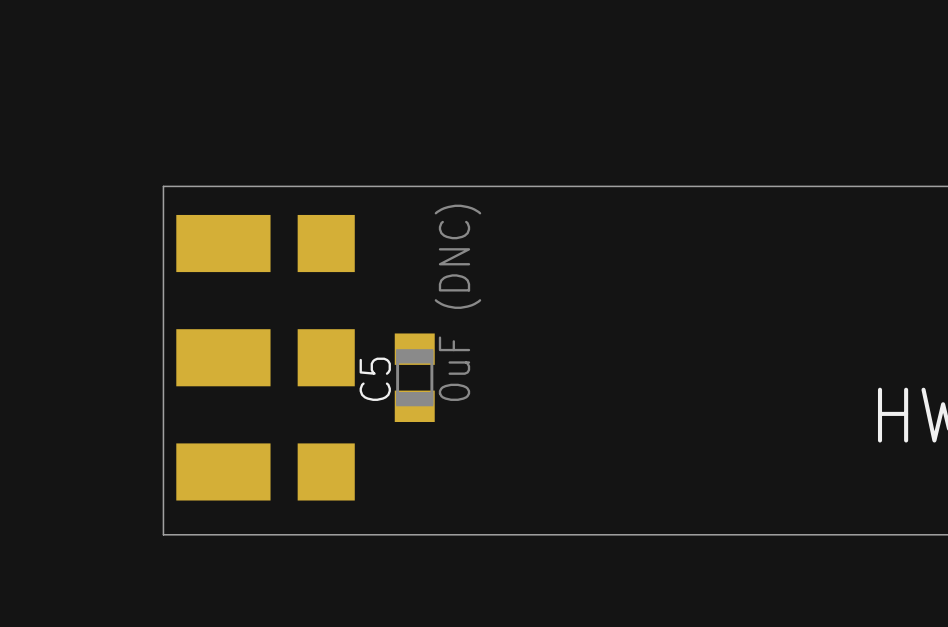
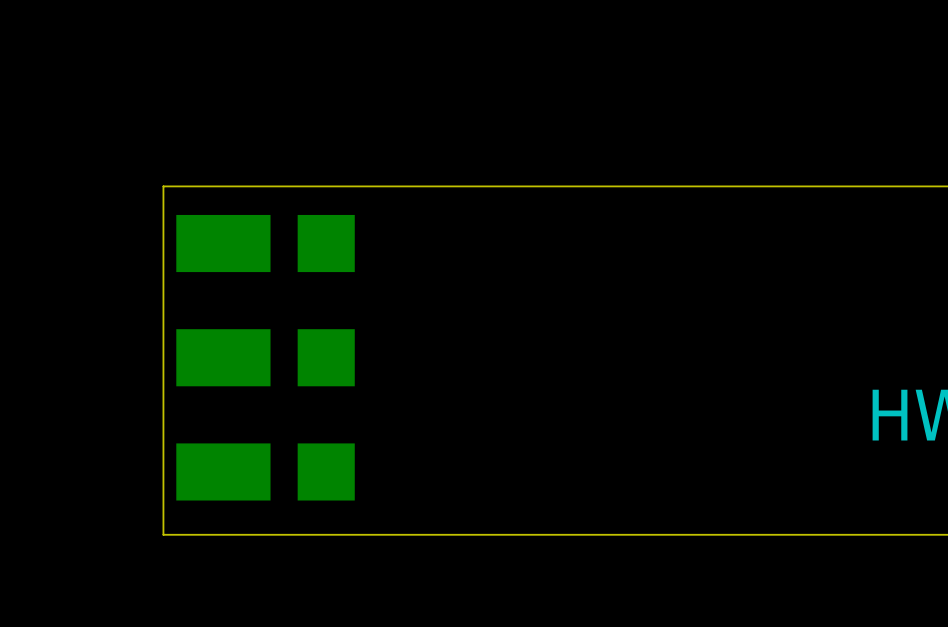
C5: 0uF (DNC) (414, 377) -> none

